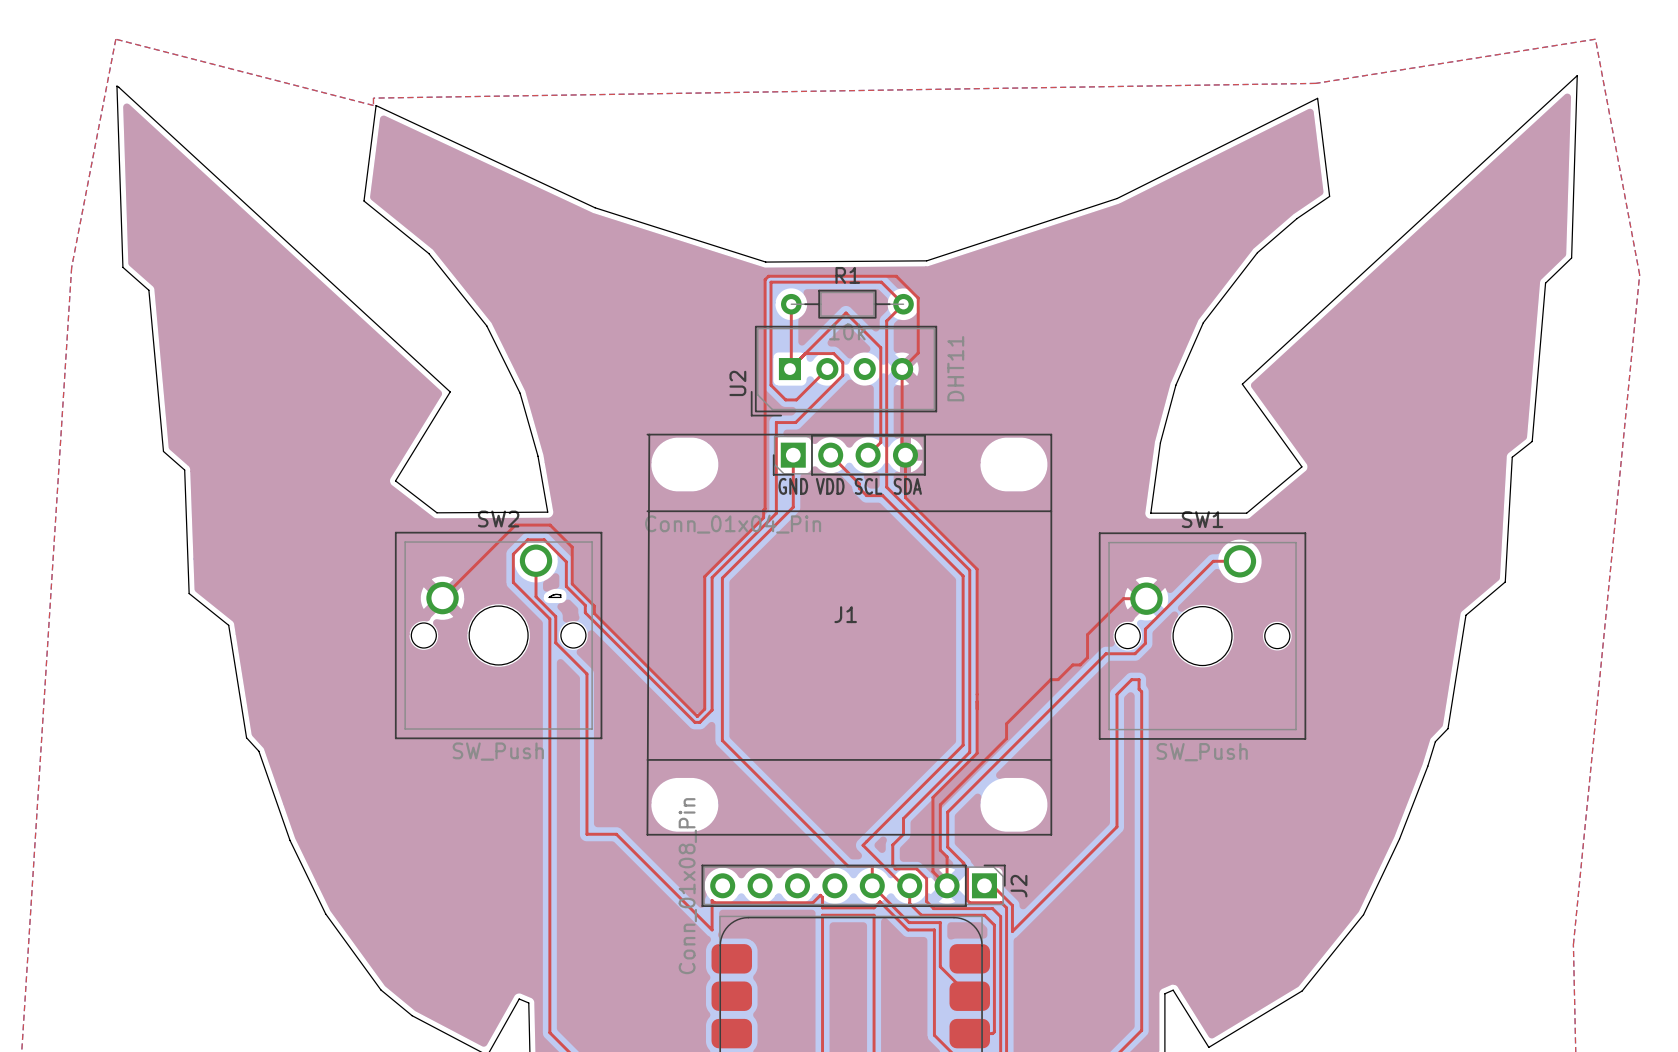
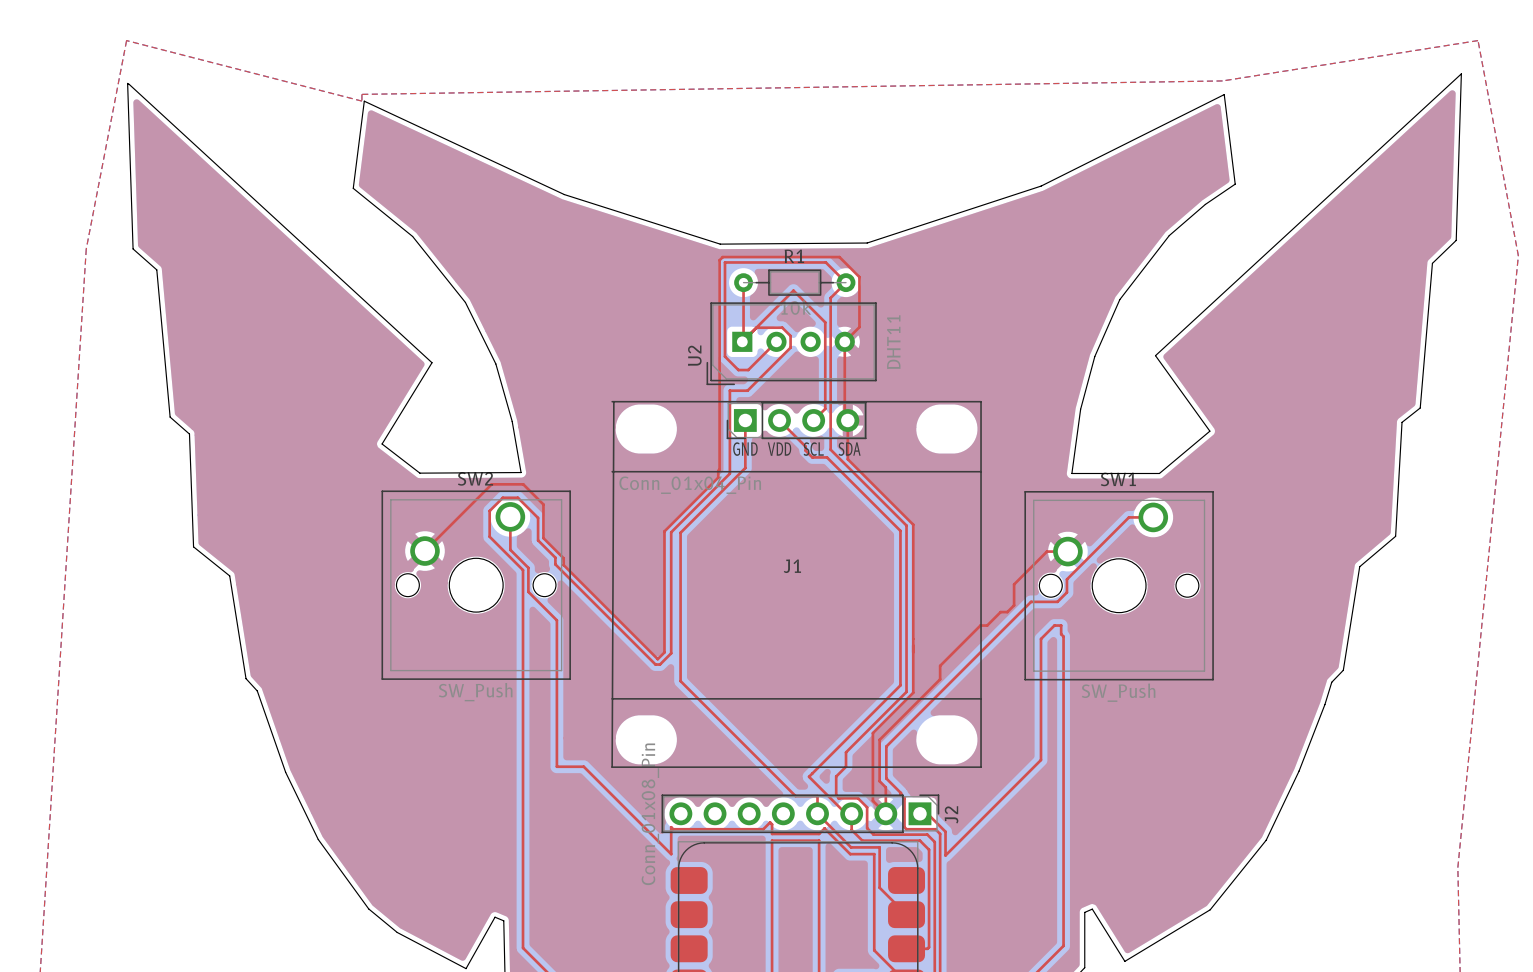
board edge: (555, 594) (552, 595) (549, 597) (560, 597) (560, 594) (555, 594) -> none

